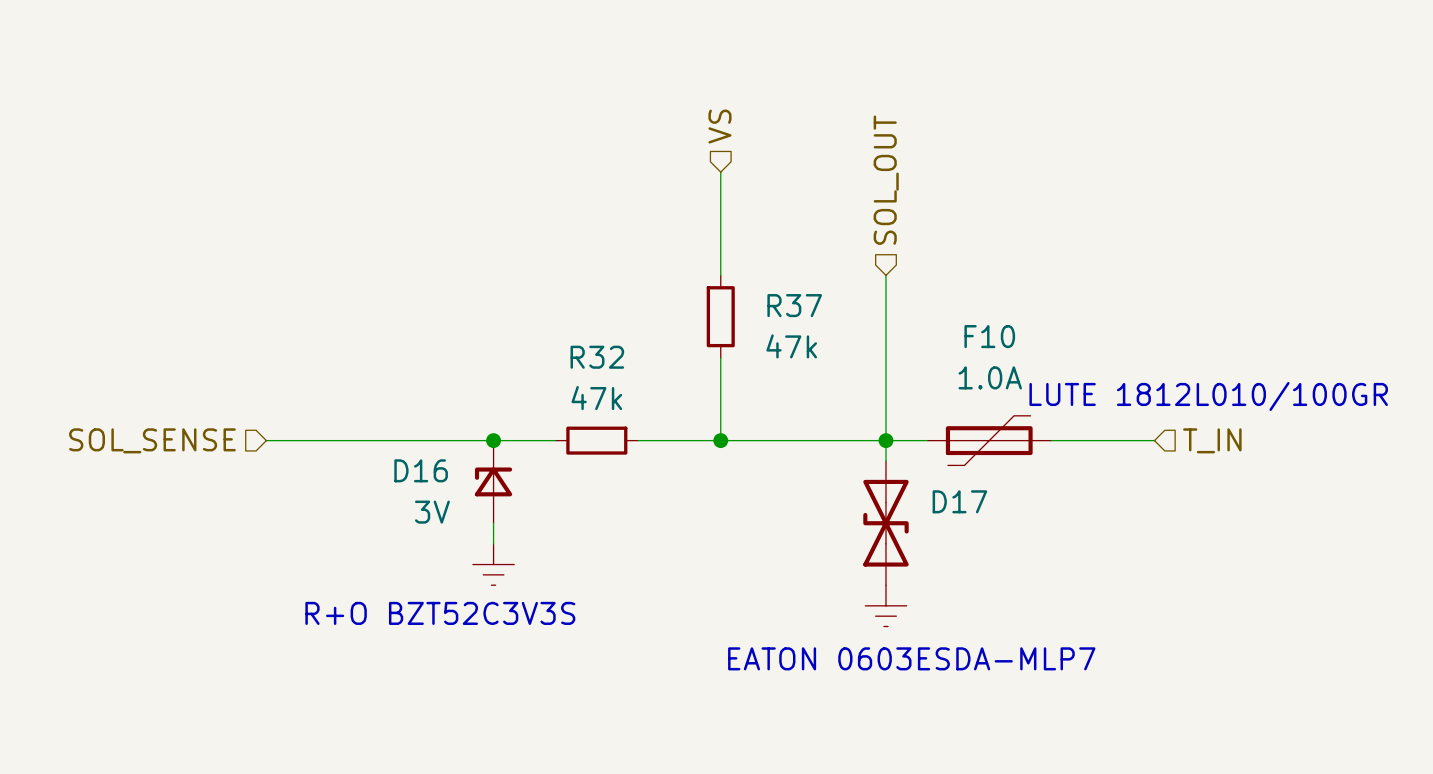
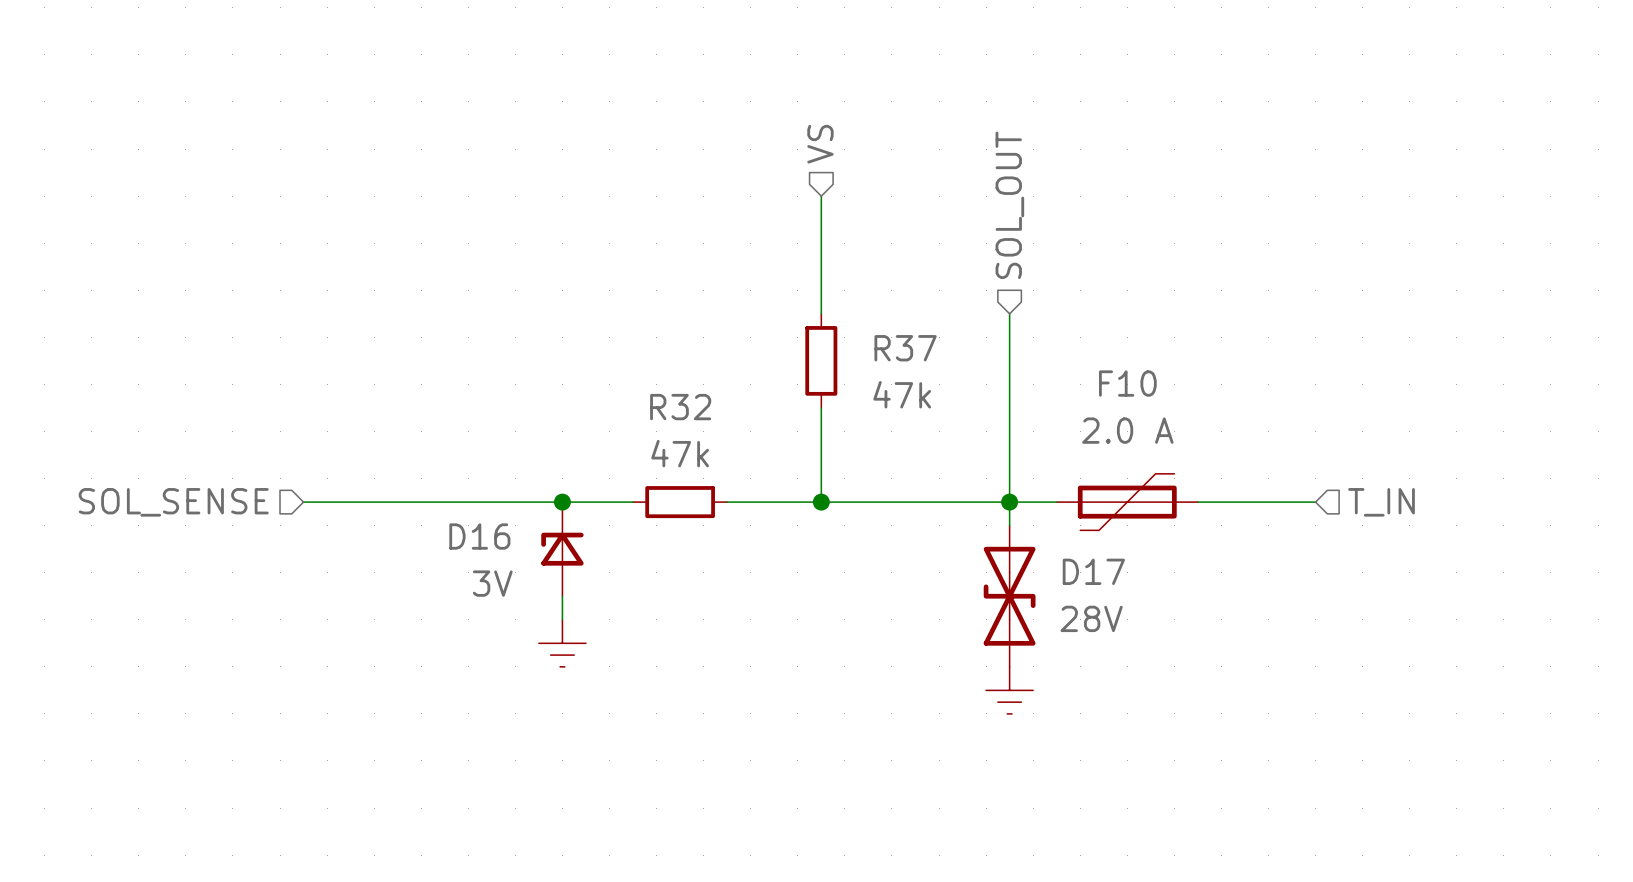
F10 value: 1.0A (990, 377) -> 2.0 A (1127, 430)
text: LUTE 1812L010/100GR (1208, 396) -> none
D17 value: none -> 28V (1091, 618)
text: R+O BZT52C3V3S (440, 613) -> none
text: EATON 0603ESDA-MLP7 (911, 658) -> none

